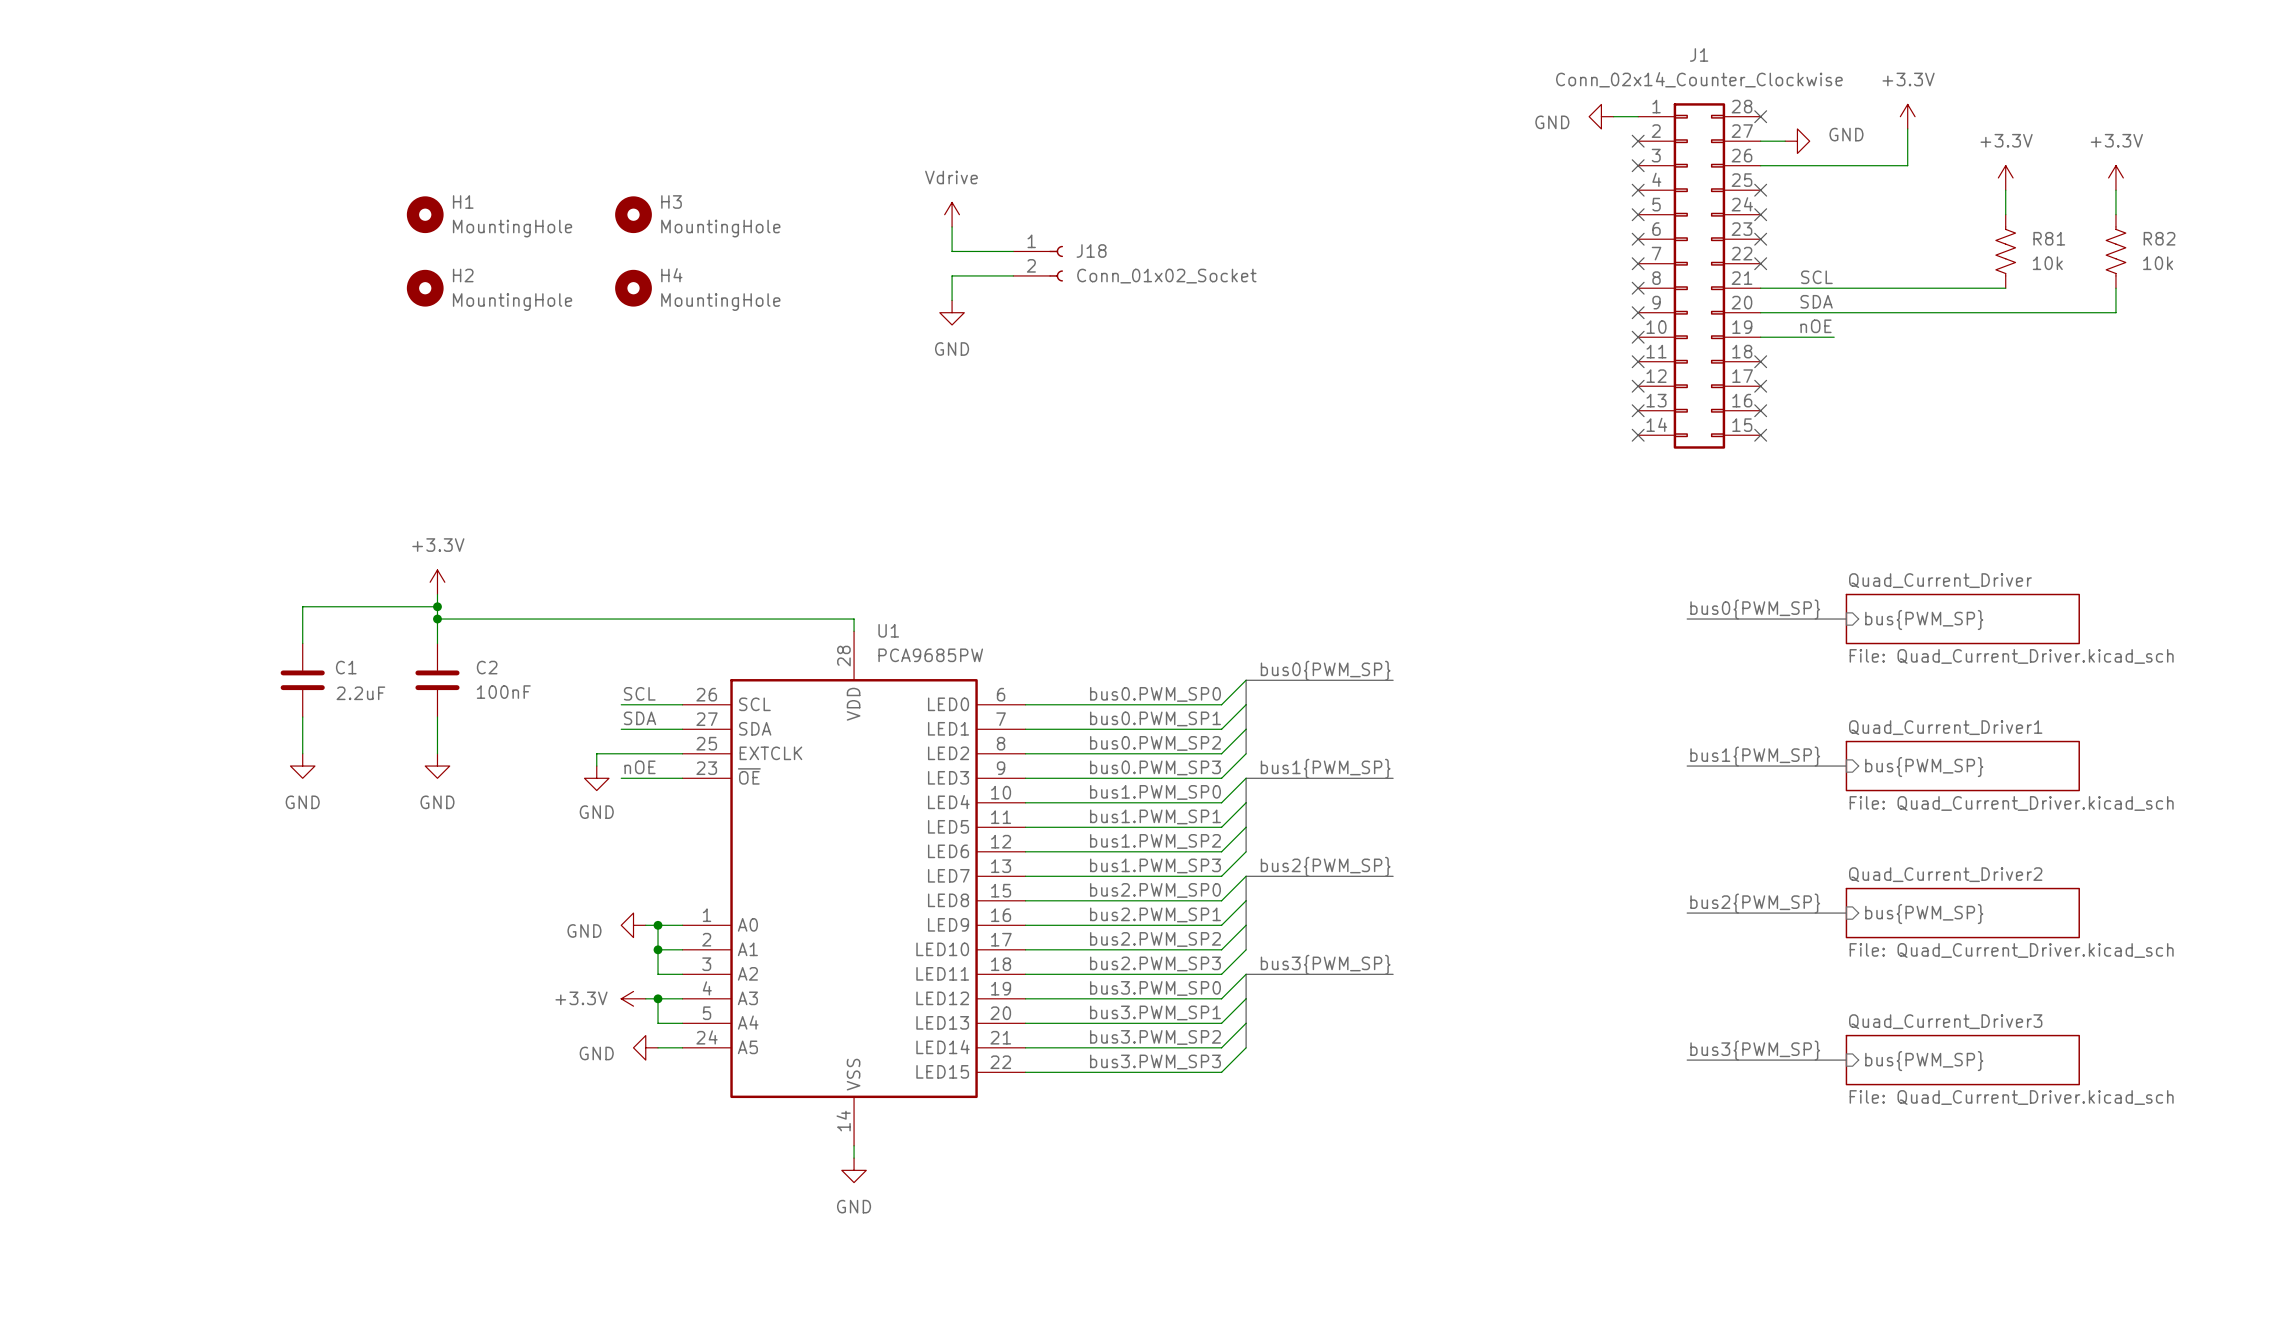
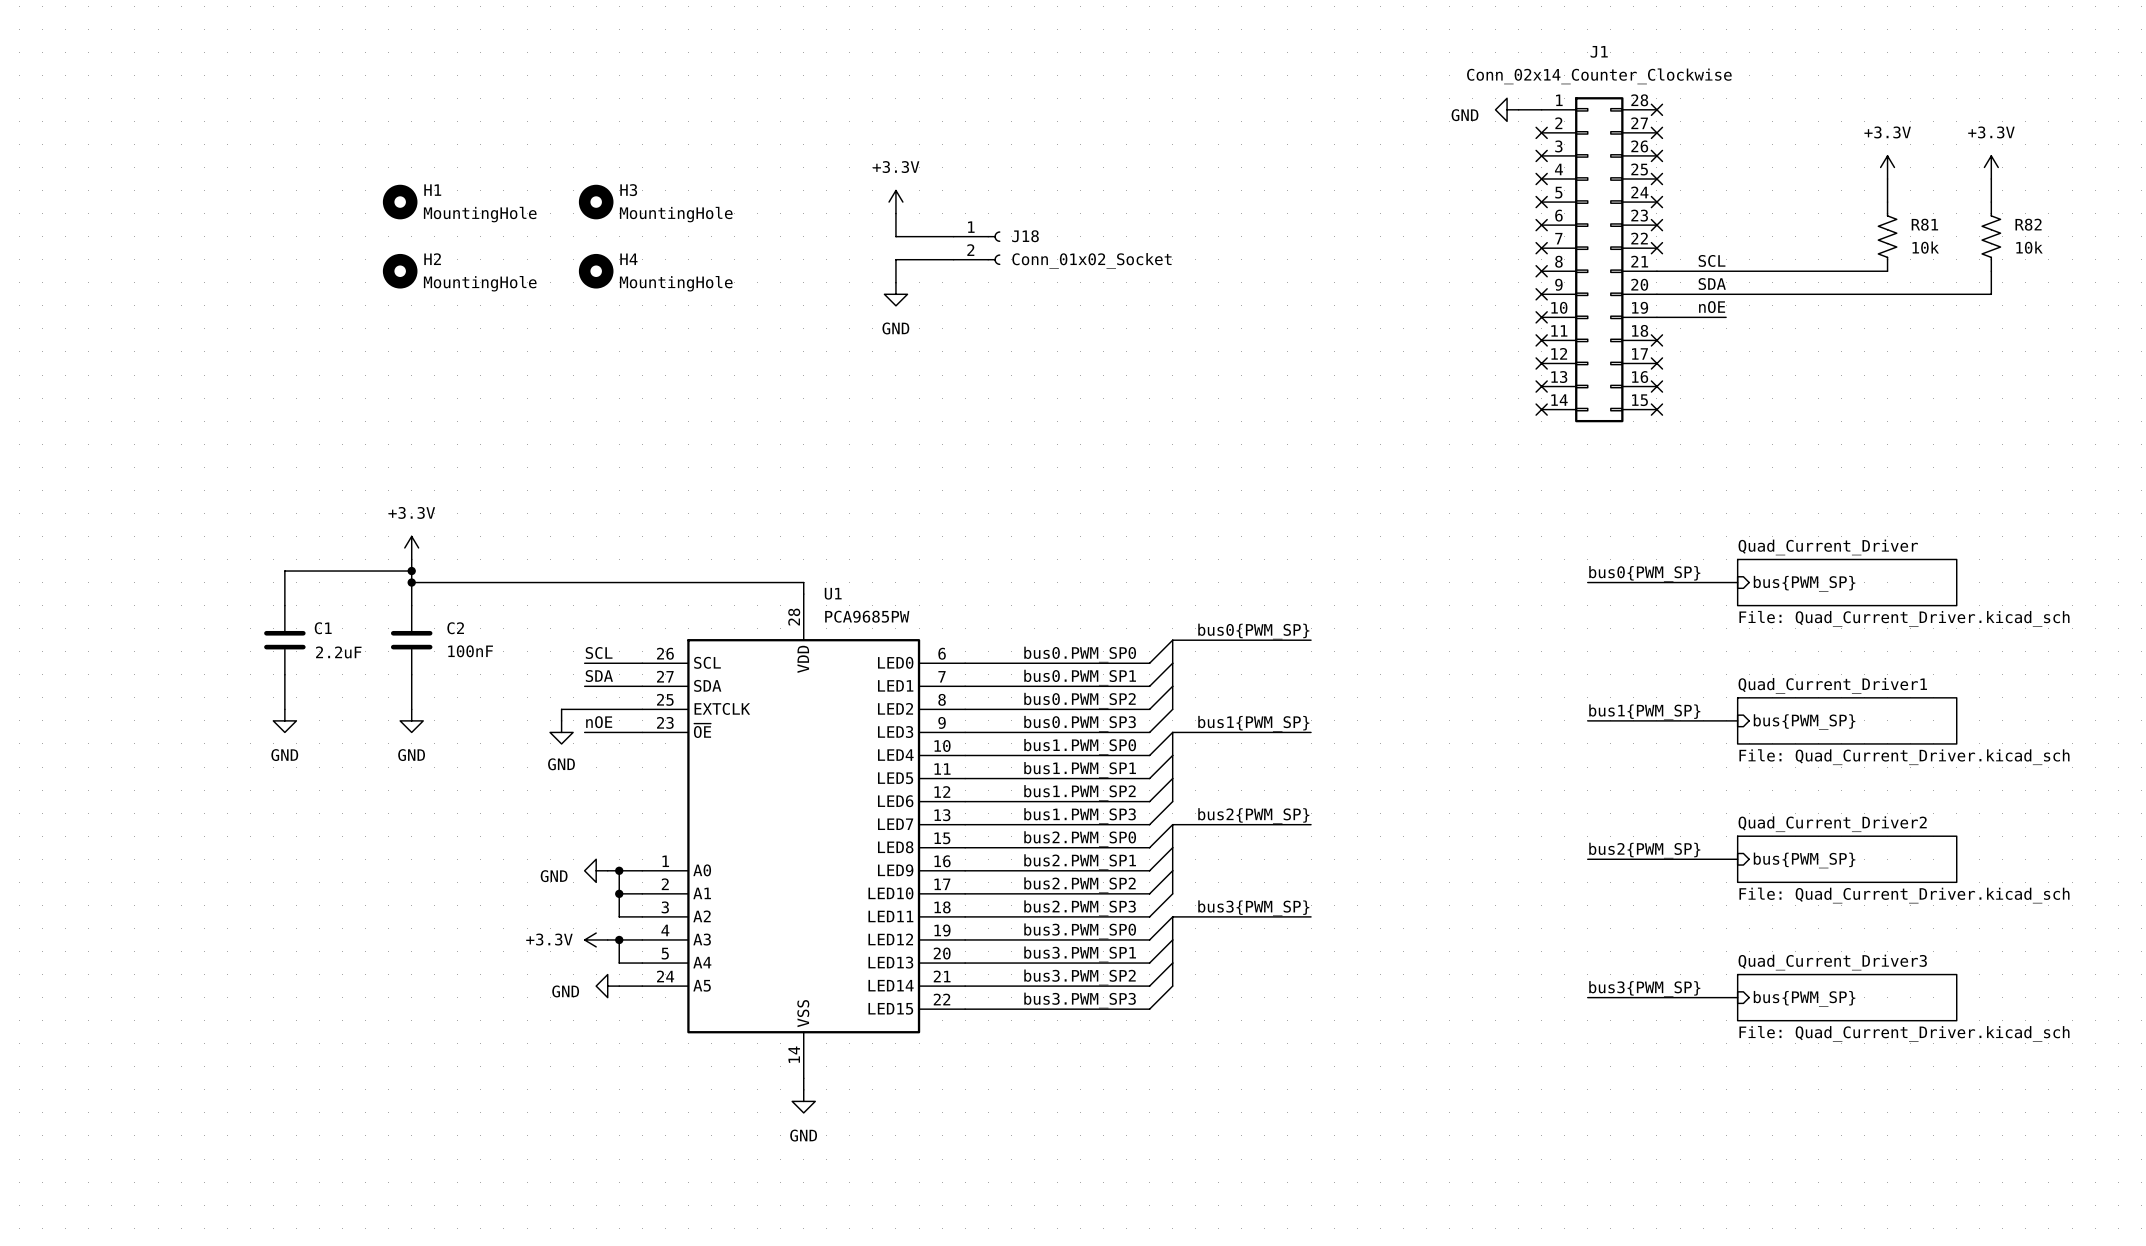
power symbol: +3.3V (1907, 116) -> none
wire: (1907, 128) (1907, 165) (1760, 165) -> none
wire: (1760, 141) (1785, 141) -> none
no-connect mark: none -> (1656, 132)
power symbol: GND (1797, 141) -> none
no-connect mark: none -> (1656, 155)
power symbol: Vdrive (952, 214) -> +3.3V (895, 202)

